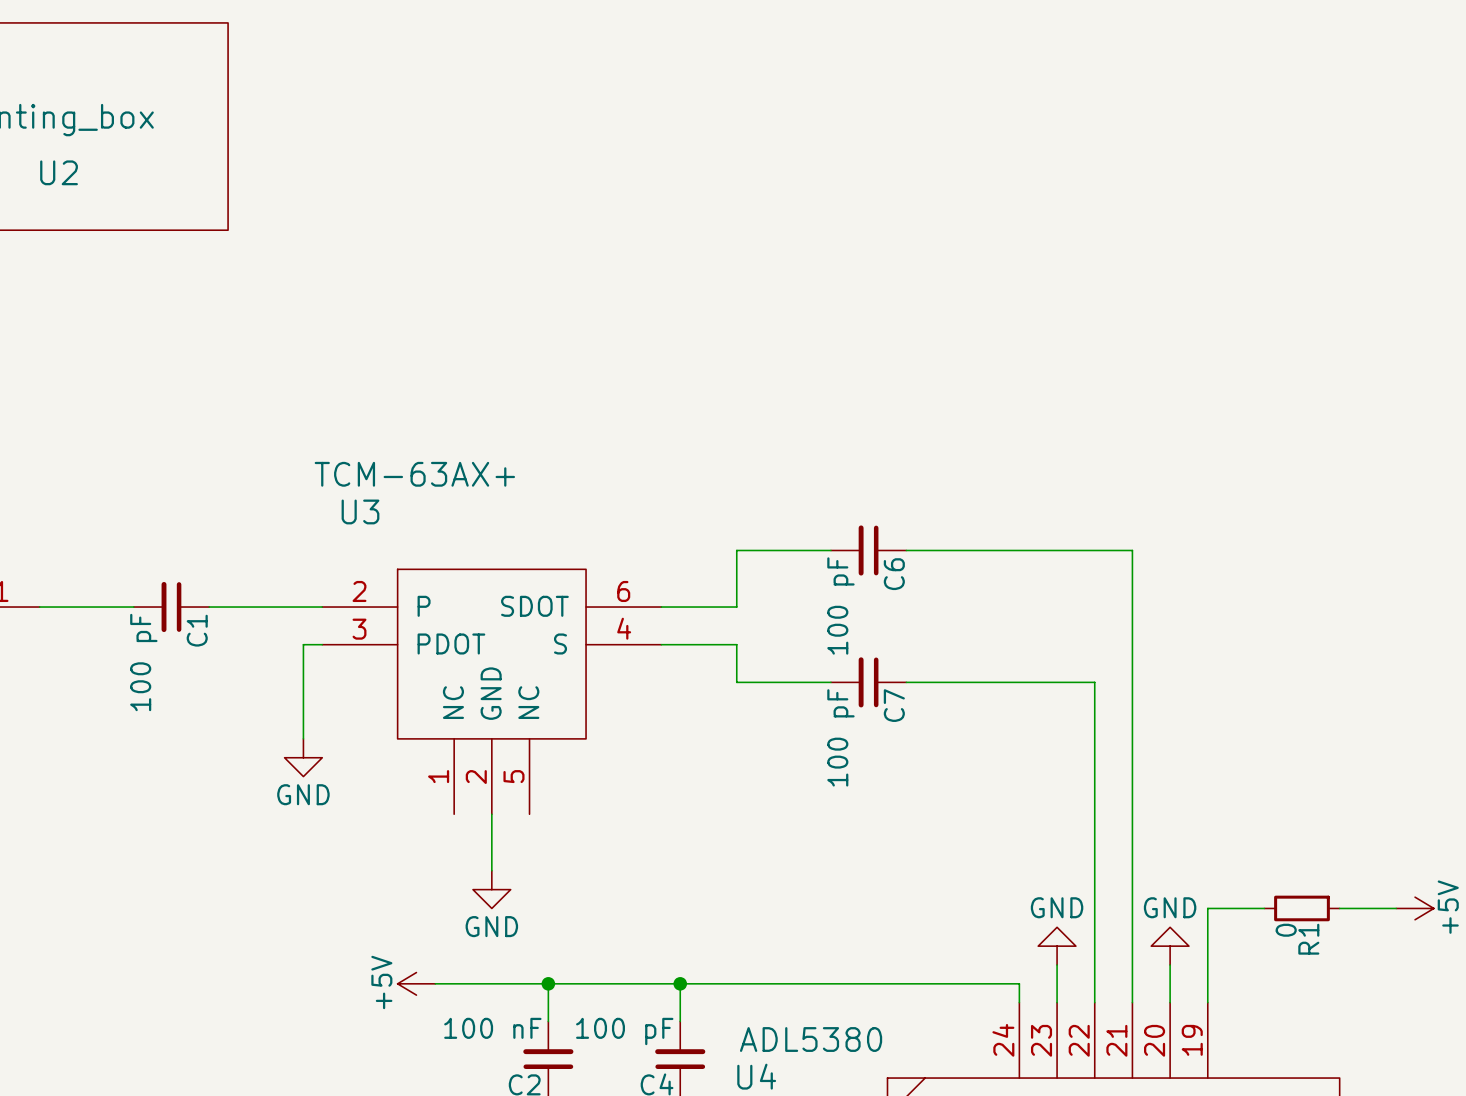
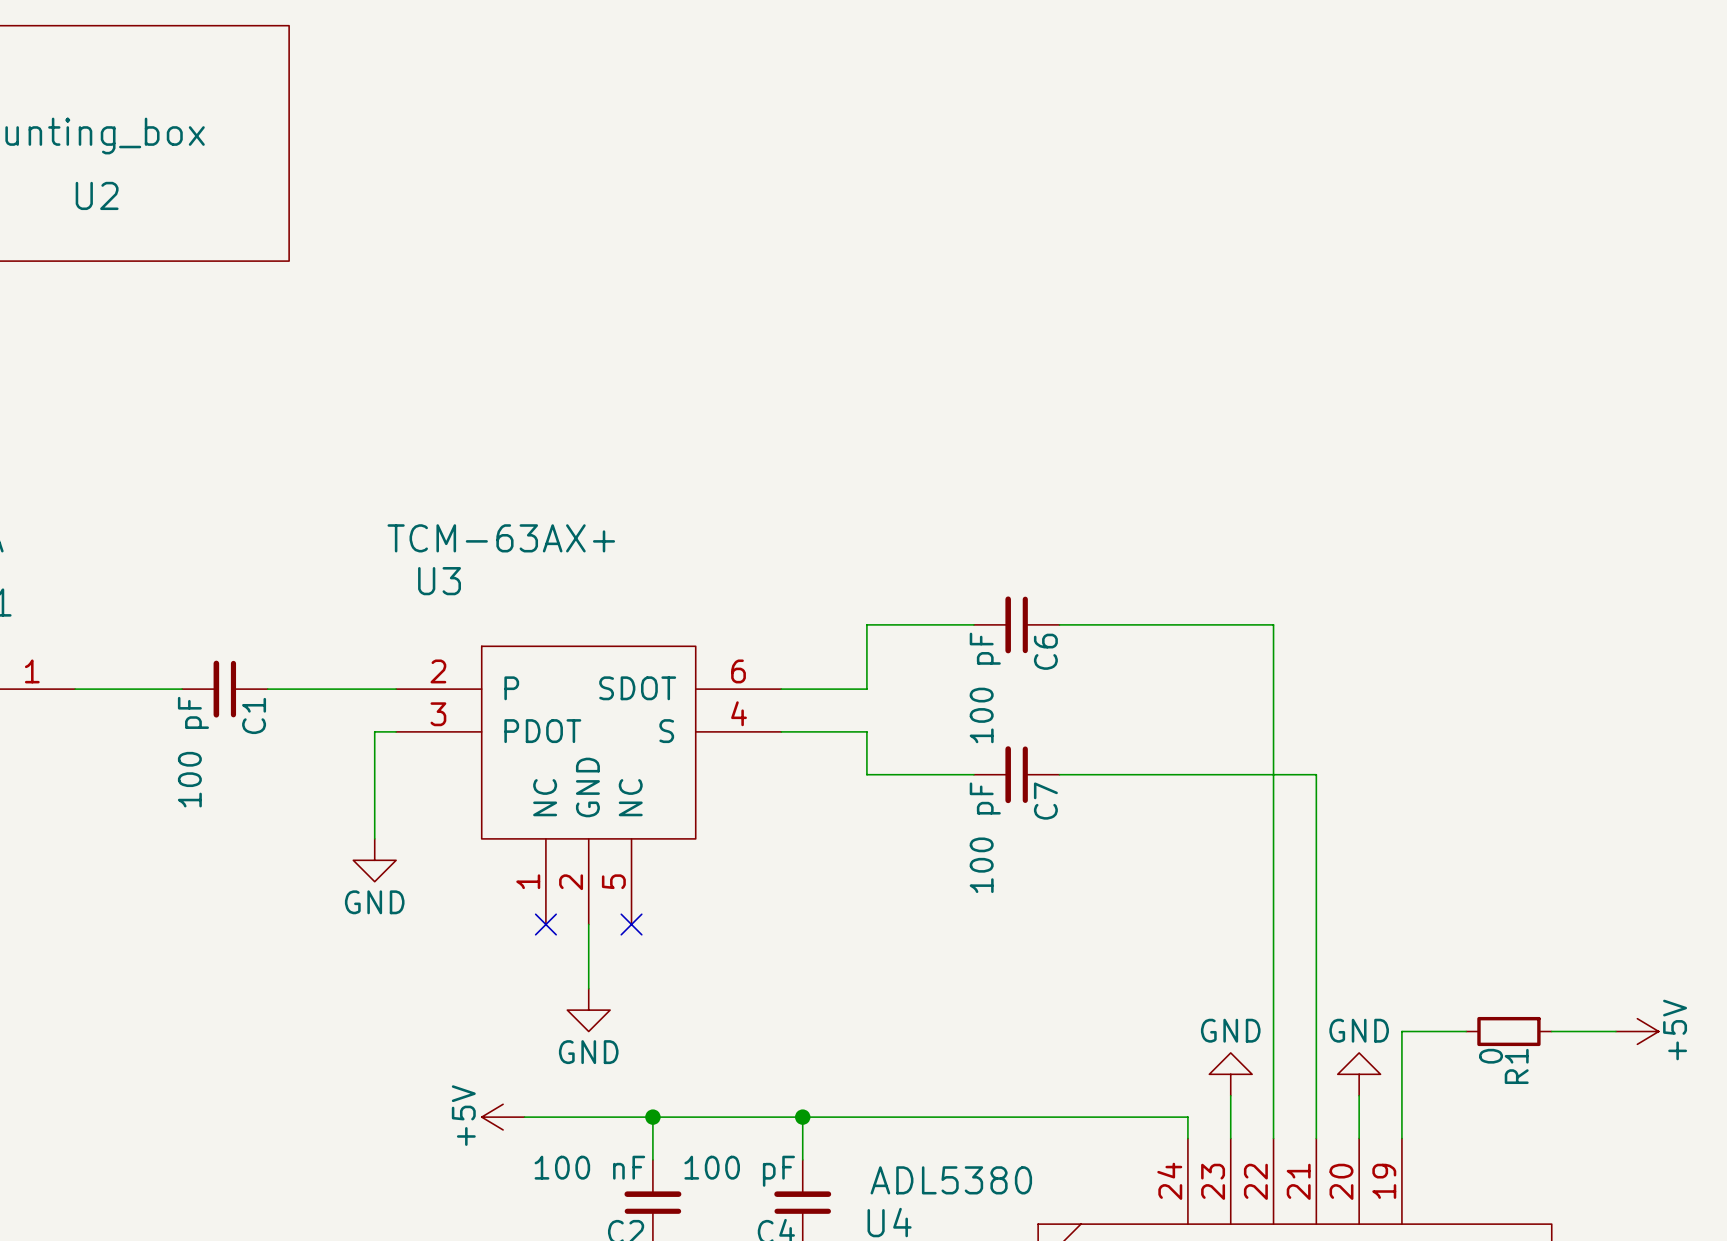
wire: (1094, 550) (1132, 550) (1132, 682) -> (1273, 624) (1273, 774) (1316, 774)
no-connect mark: none -> (545, 924)
no-connect mark: none -> (631, 924)

